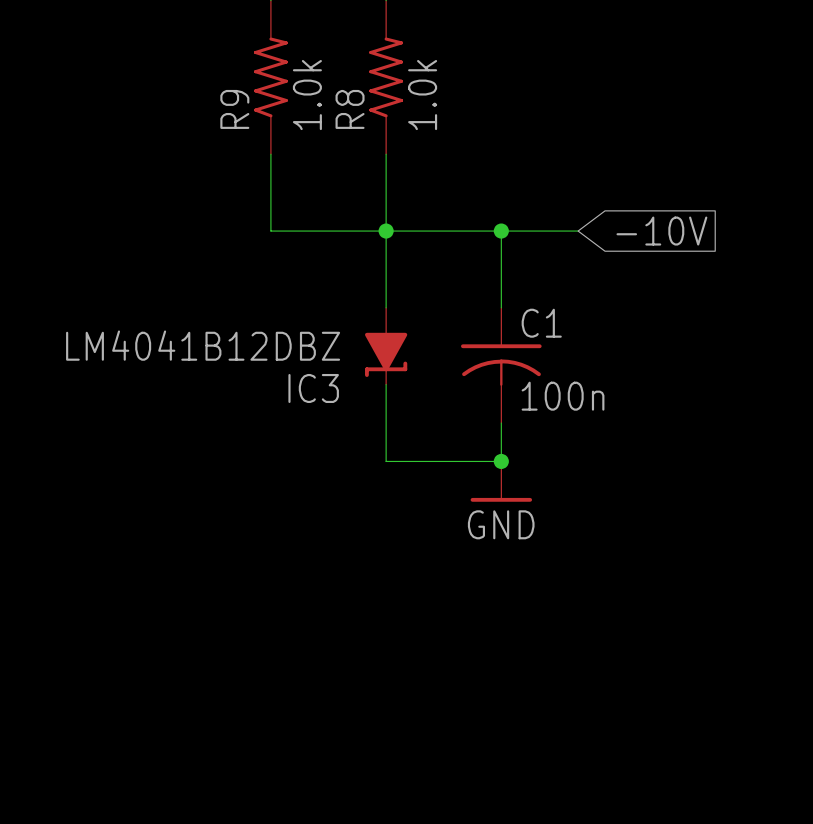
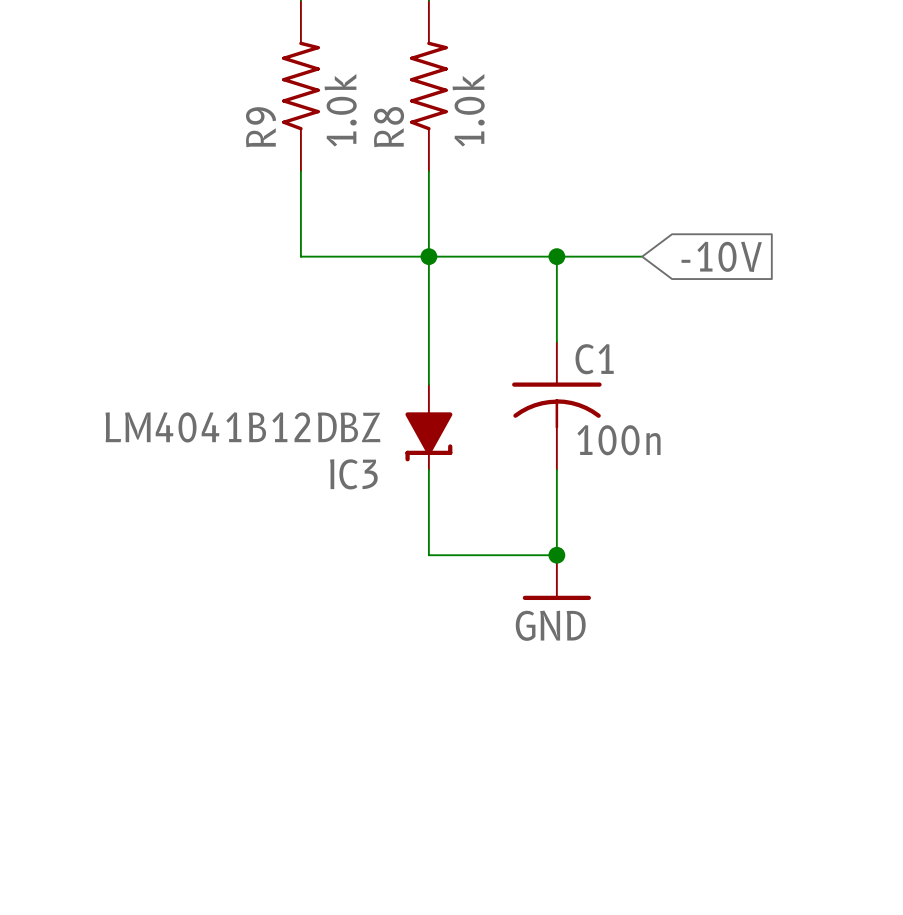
IC3 position: (386, 346) -> (428, 427)
wire: (386, 461) (501, 461) -> (428, 512) (428, 555) (556, 555) (556, 512)
junction position: (501, 461) -> (556, 555)
power symbol position: GND (501, 481) -> GND (556, 577)

